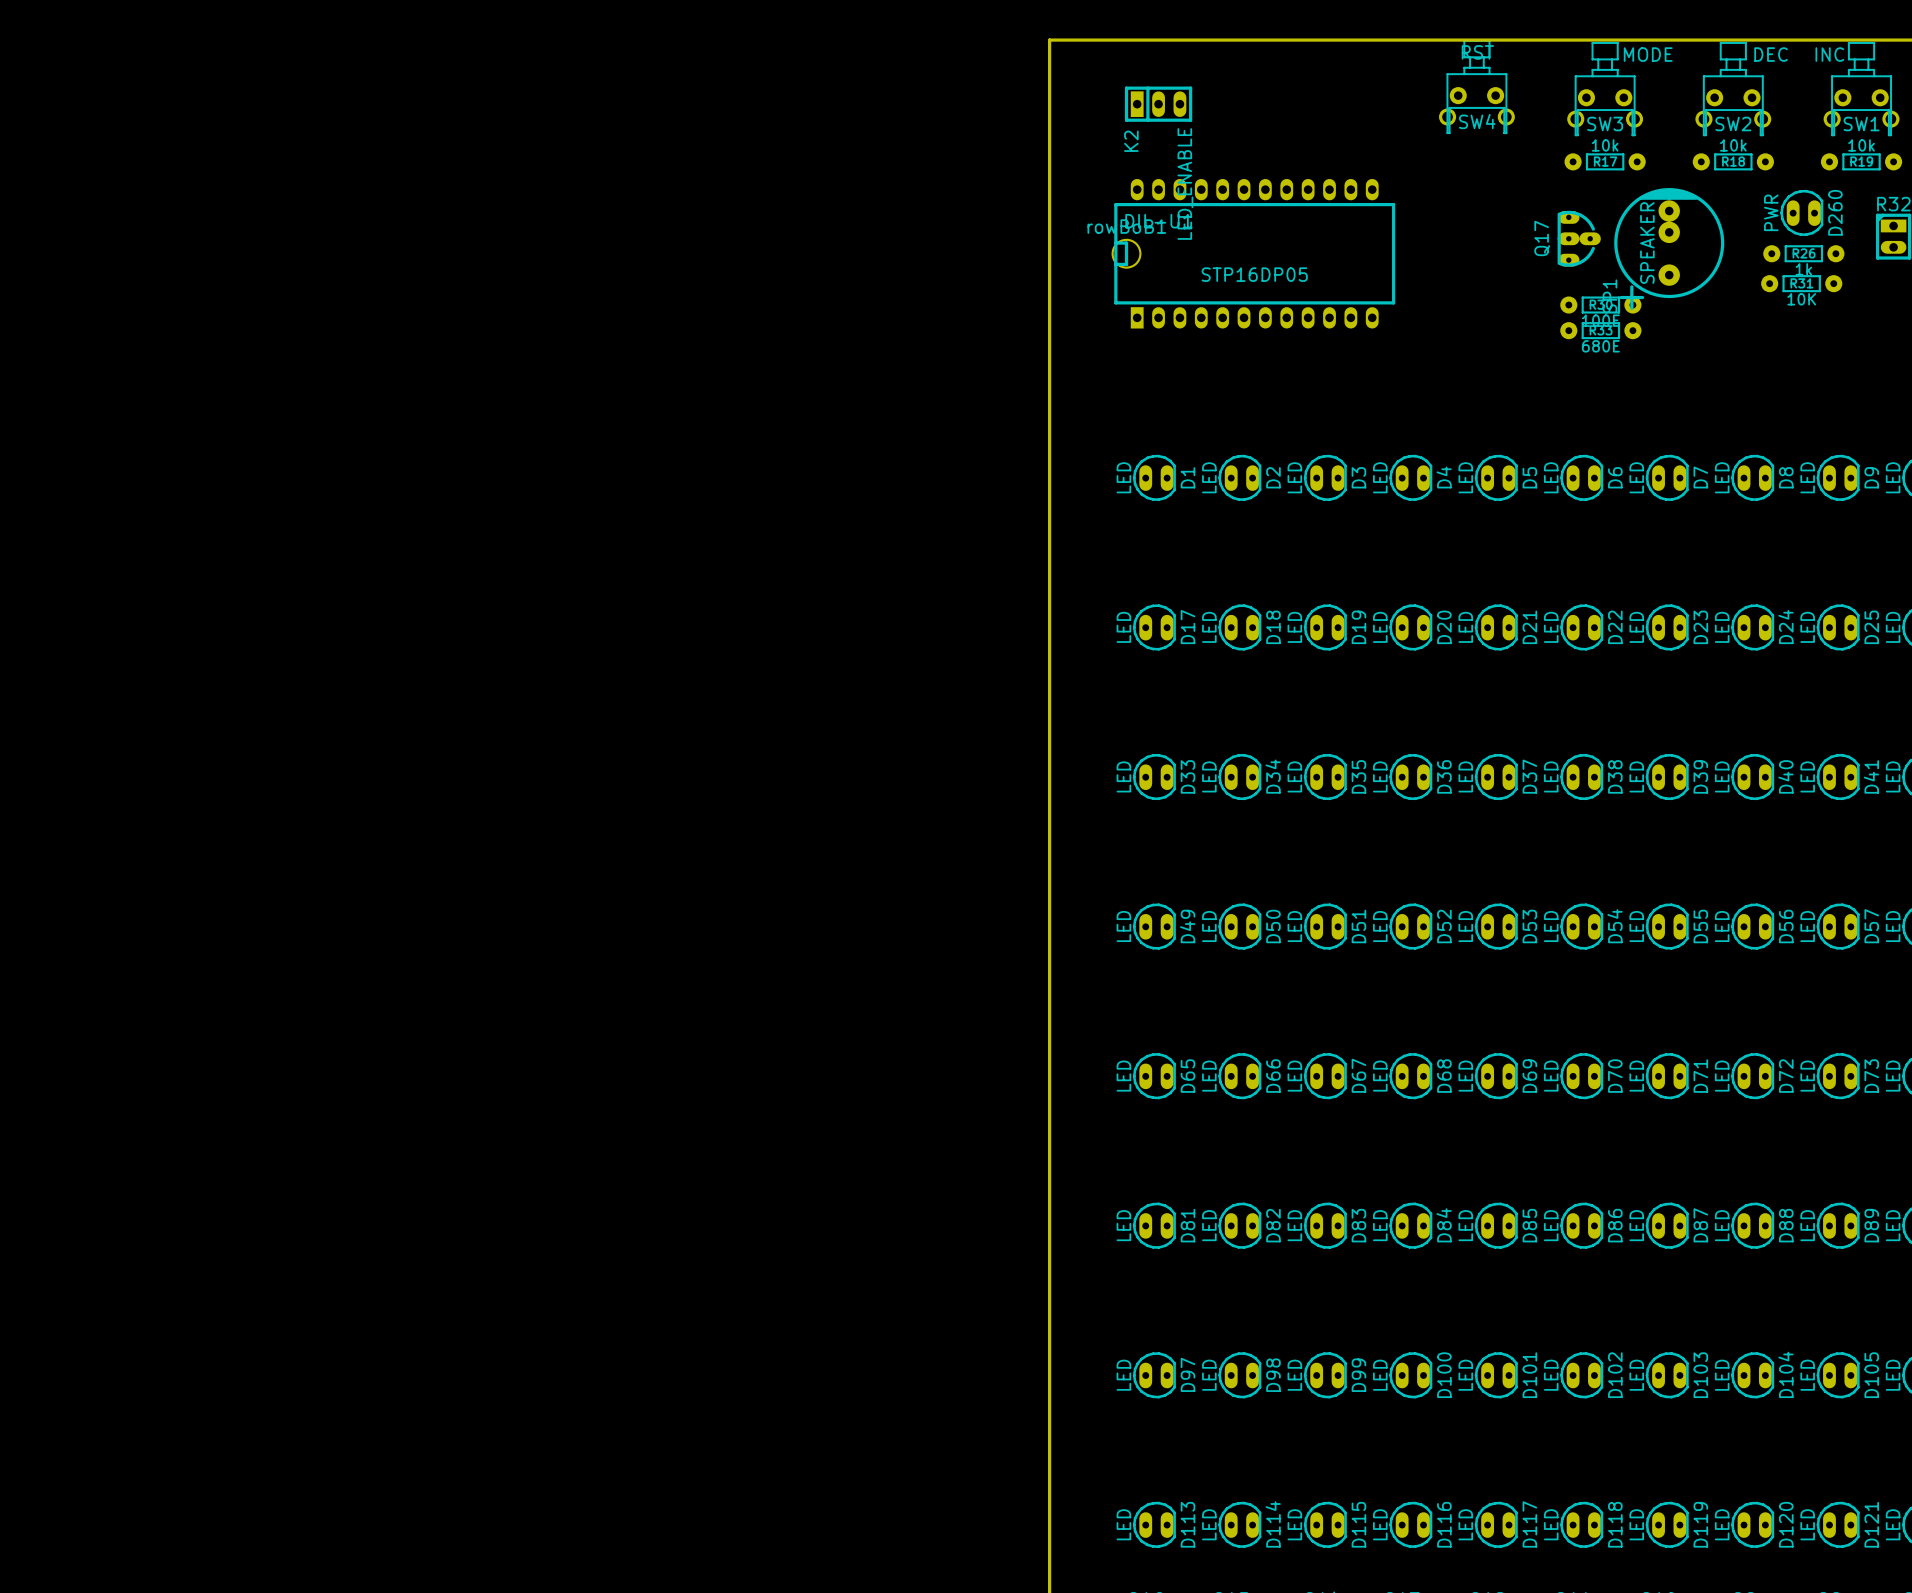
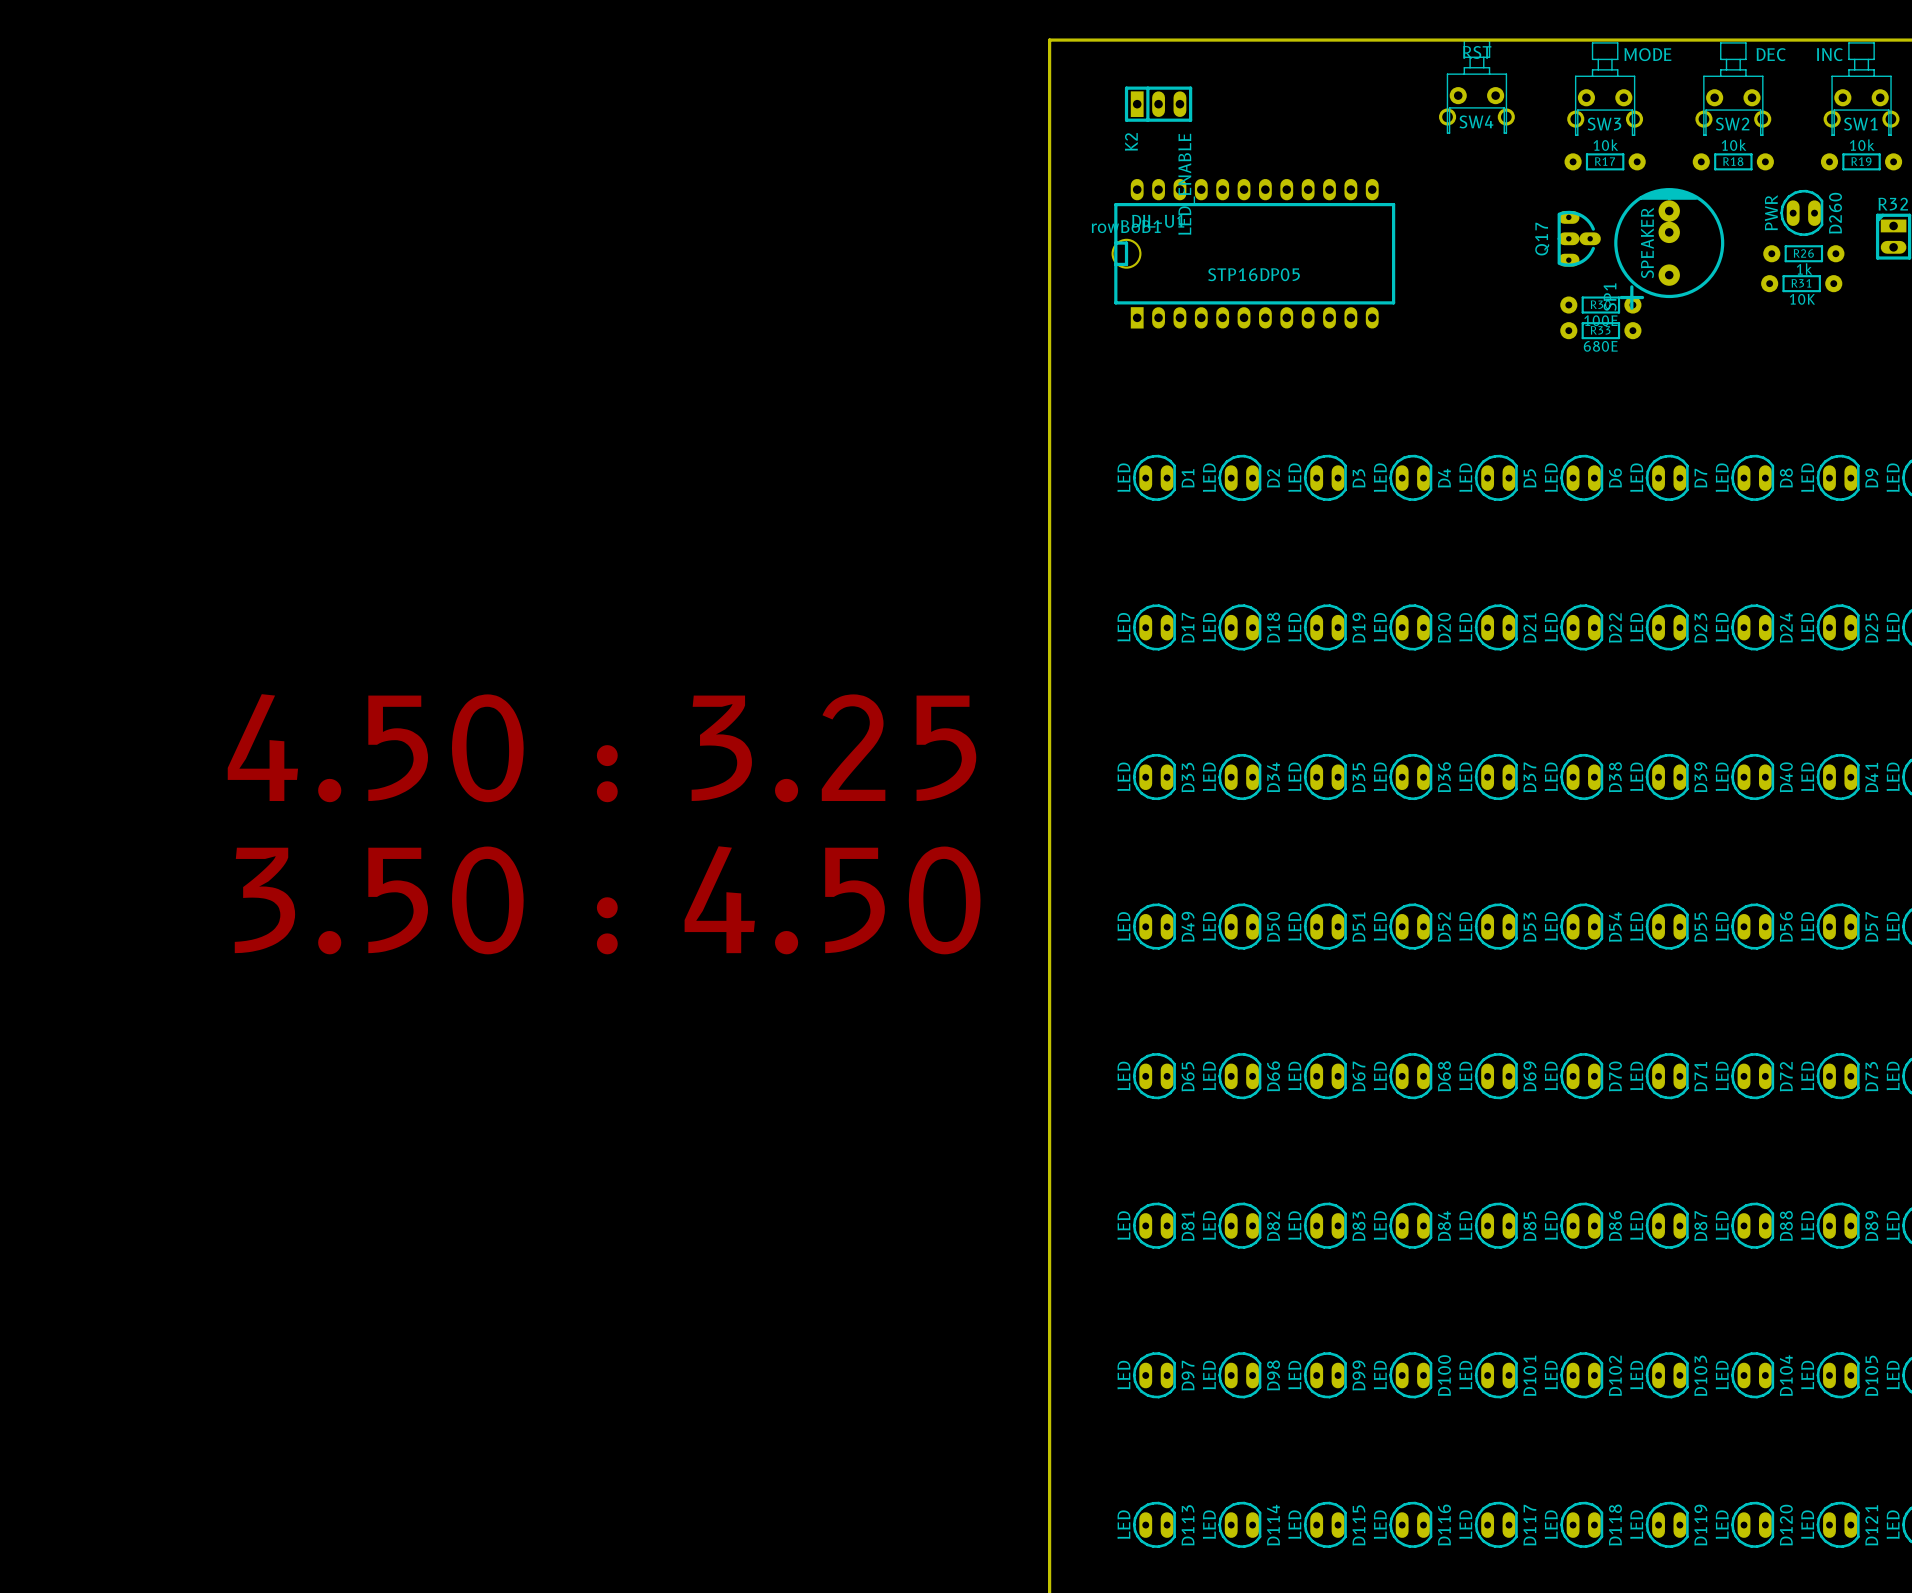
text: none -> 4.50 : 3.25 (601, 748)
text: none -> 3.50 : 4.50 (607, 900)

